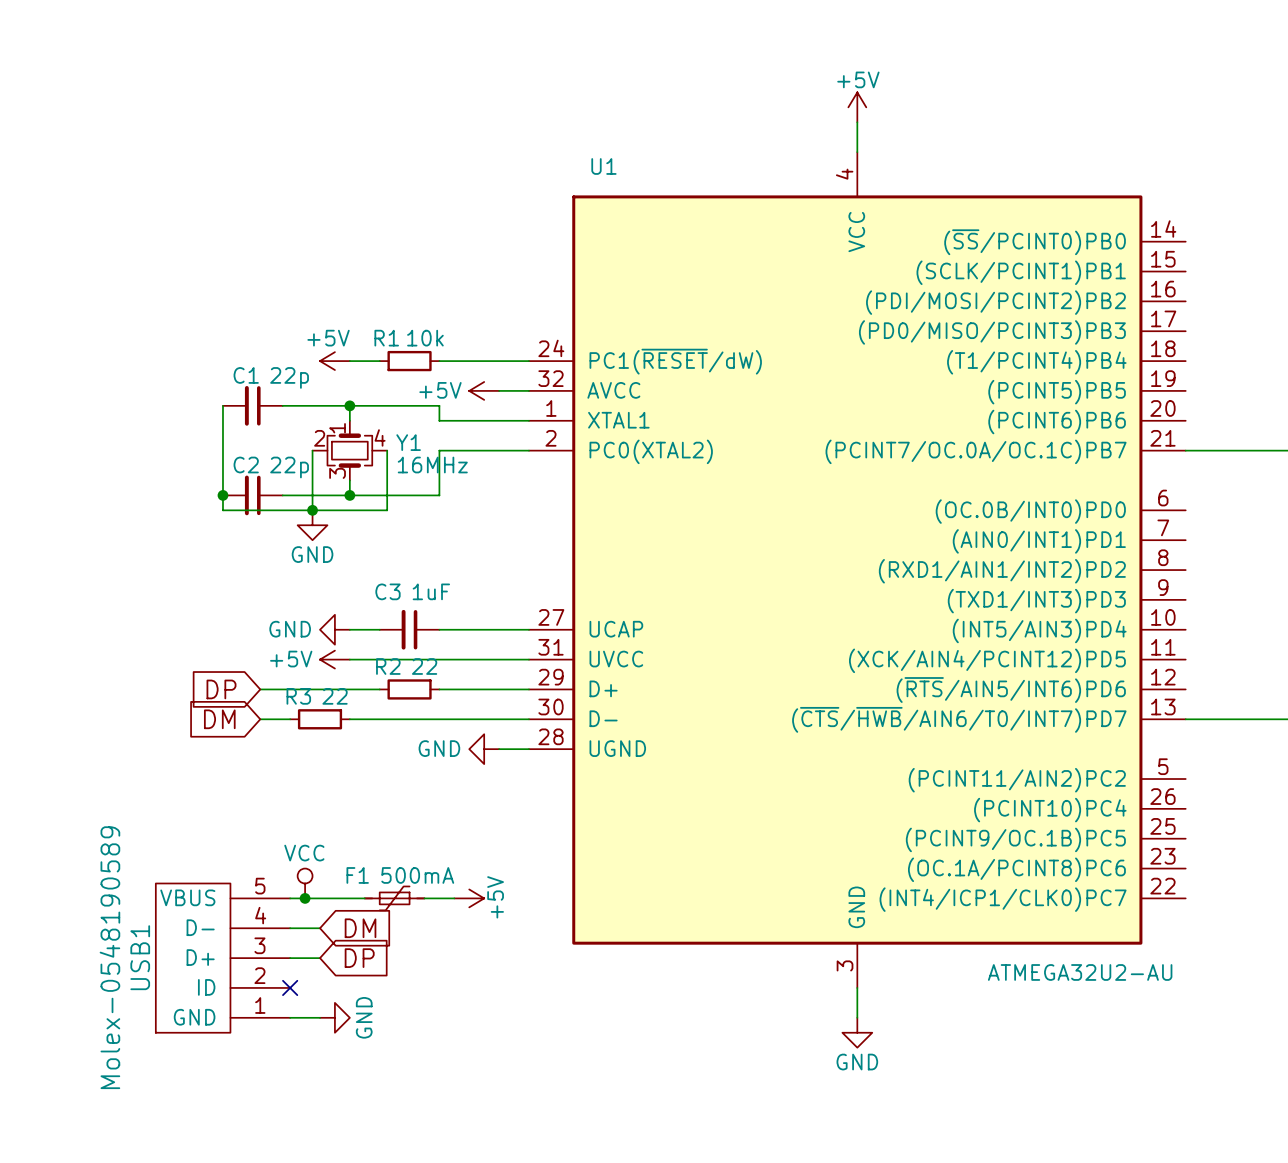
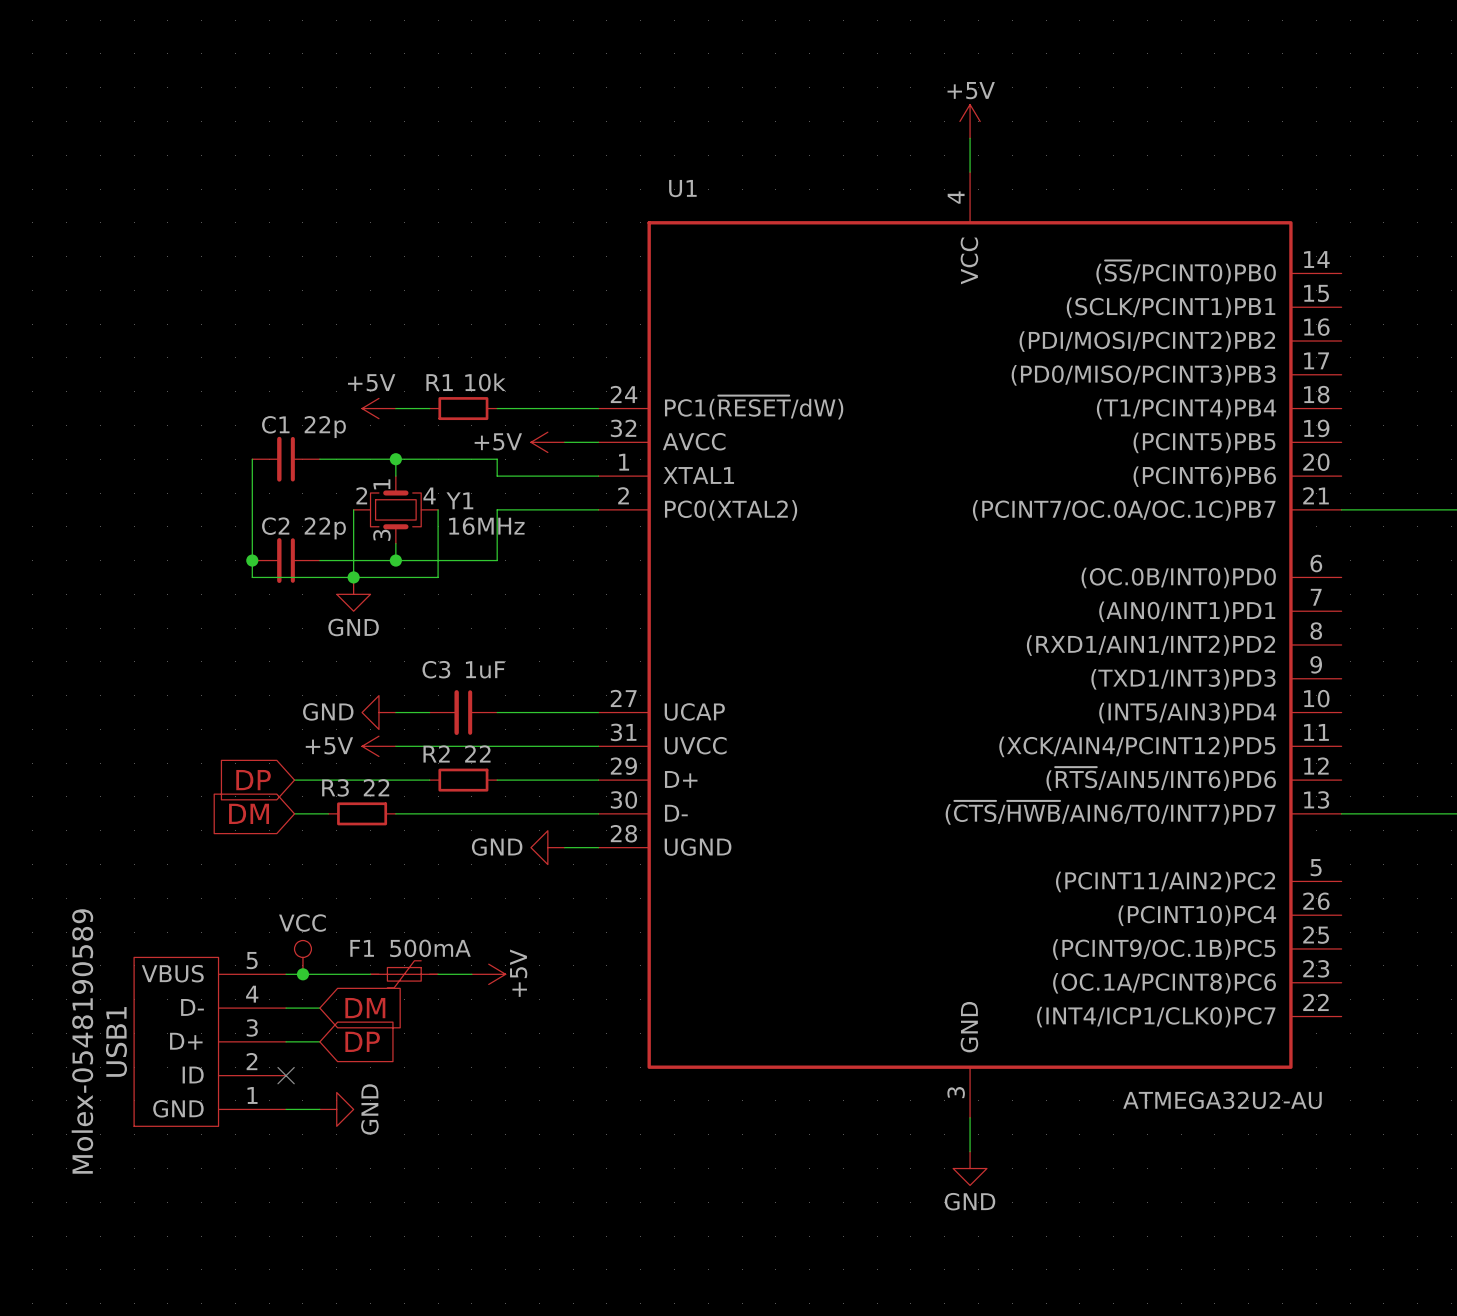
power symbol position: VCC (305, 883) -> VCC (302, 957)
wire: (290, 898) (364, 898) -> (286, 974) (370, 974)
junction position: (305, 898) -> (302, 974)
F1 position: (394, 898) -> (404, 974)
wire: (424, 898) (454, 898) -> (438, 974) (471, 974)
power symbol position: +5V (469, 898) -> +5V (488, 974)
wire: (290, 928) (320, 928) -> (286, 1008) (319, 1008)
global label position: DM (360, 928) -> DM (365, 1008)
USB1 position: (222, 958) -> (210, 1041)
wire: (290, 958) (320, 958) -> (286, 1041) (319, 1041)
global label position: DP (359, 958) -> DP (362, 1041)
no-connect mark position: (290, 987) -> (286, 1075)
wire: (290, 1017) (320, 1017) -> (286, 1109) (319, 1109)
power symbol position: GND (334, 1017) -> GND (336, 1109)

